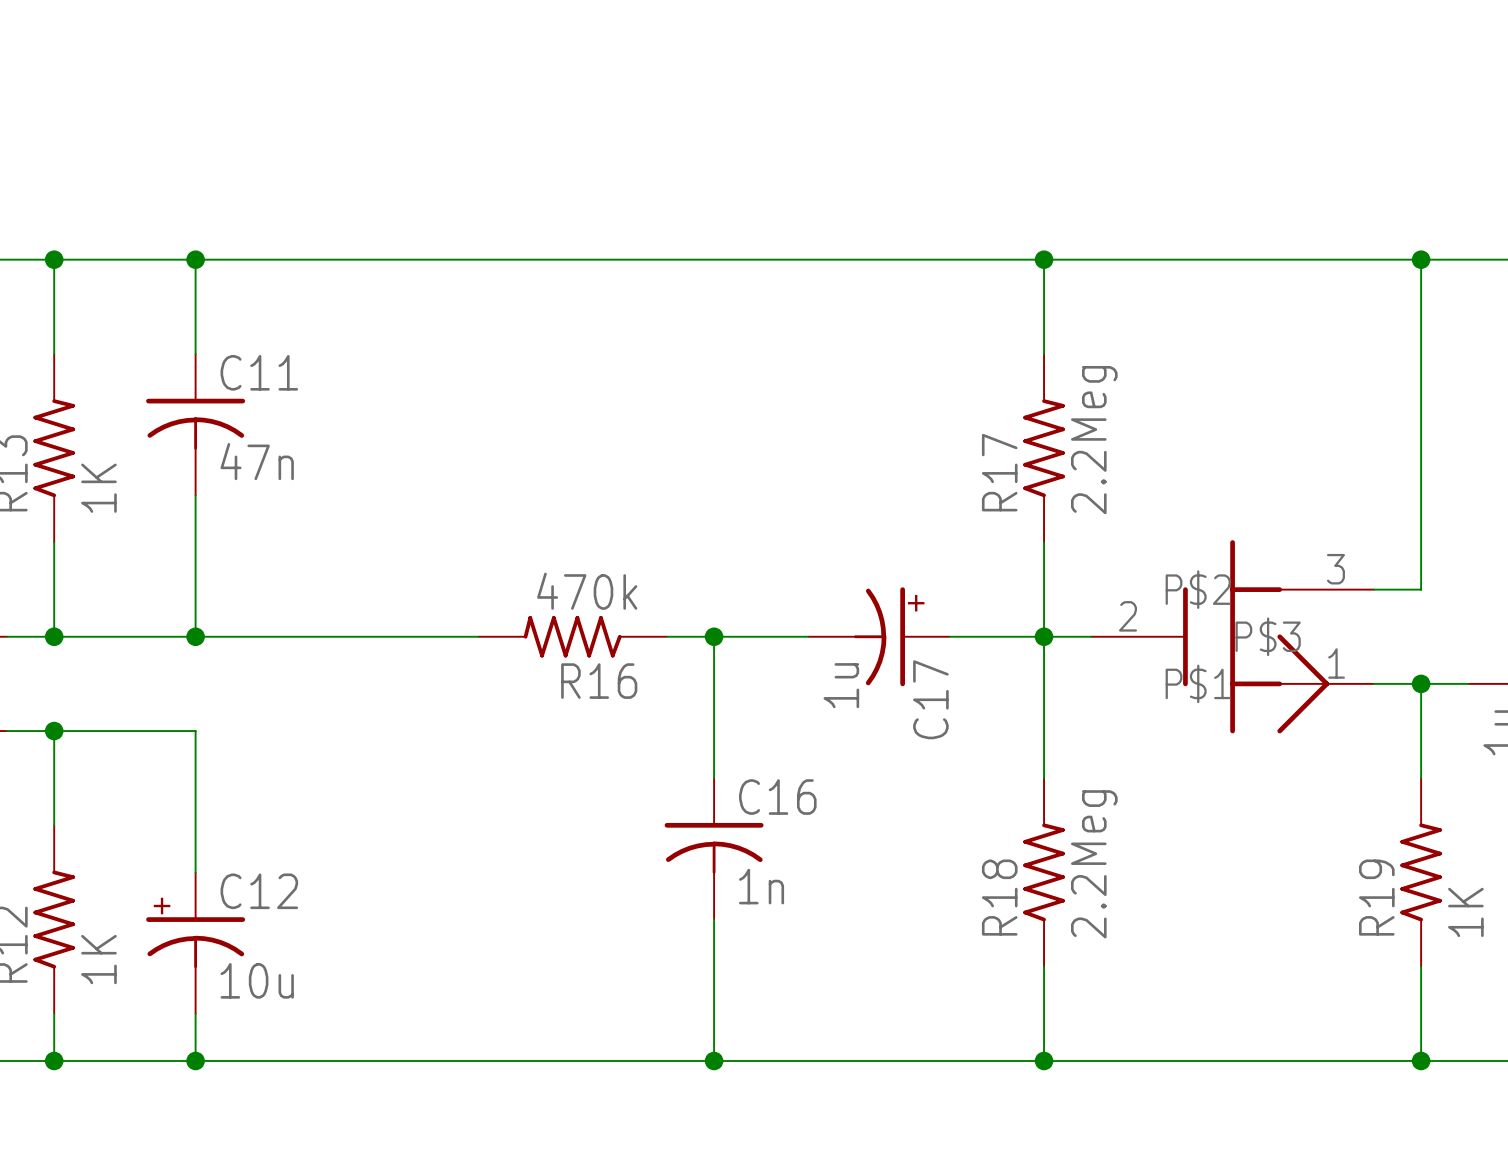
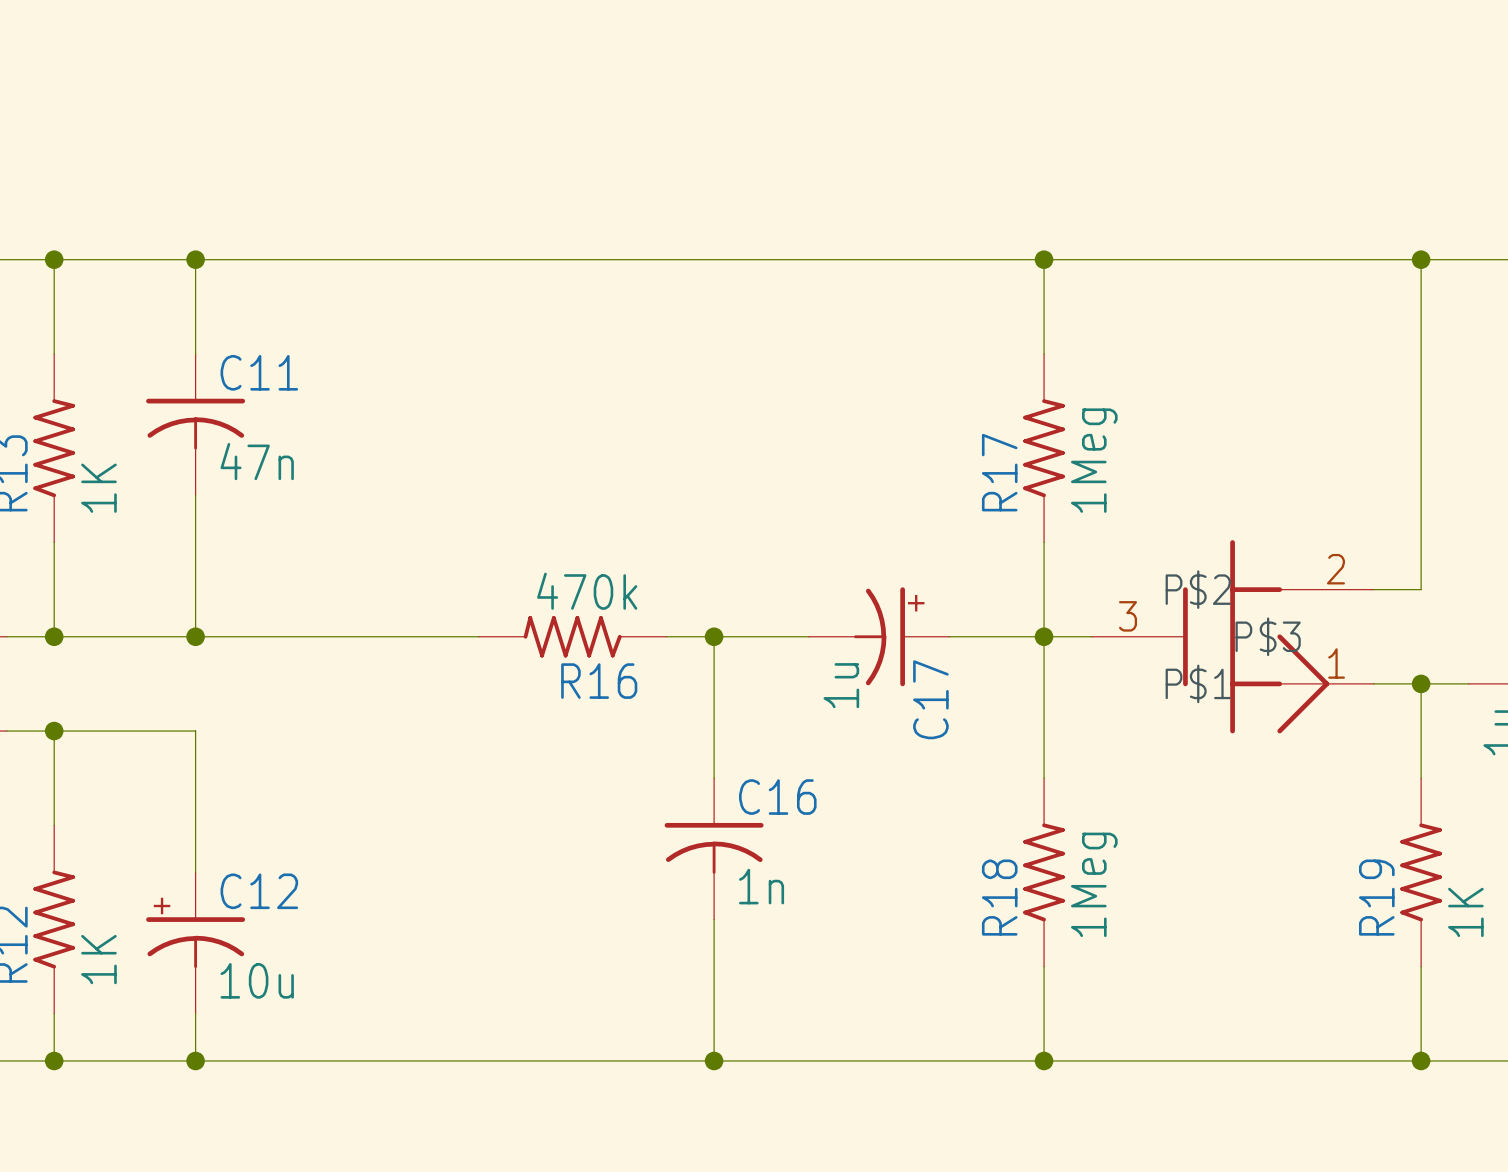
R17 value: 2.2Meg (1094, 440) -> 1Meg (1094, 460)
part pin number: 3 (1335, 569) -> 2 (1335, 569)
part pin number: 2 (1127, 616) -> 3 (1127, 616)
R18 value: 2.2Meg (1094, 864) -> 1Meg (1094, 884)

